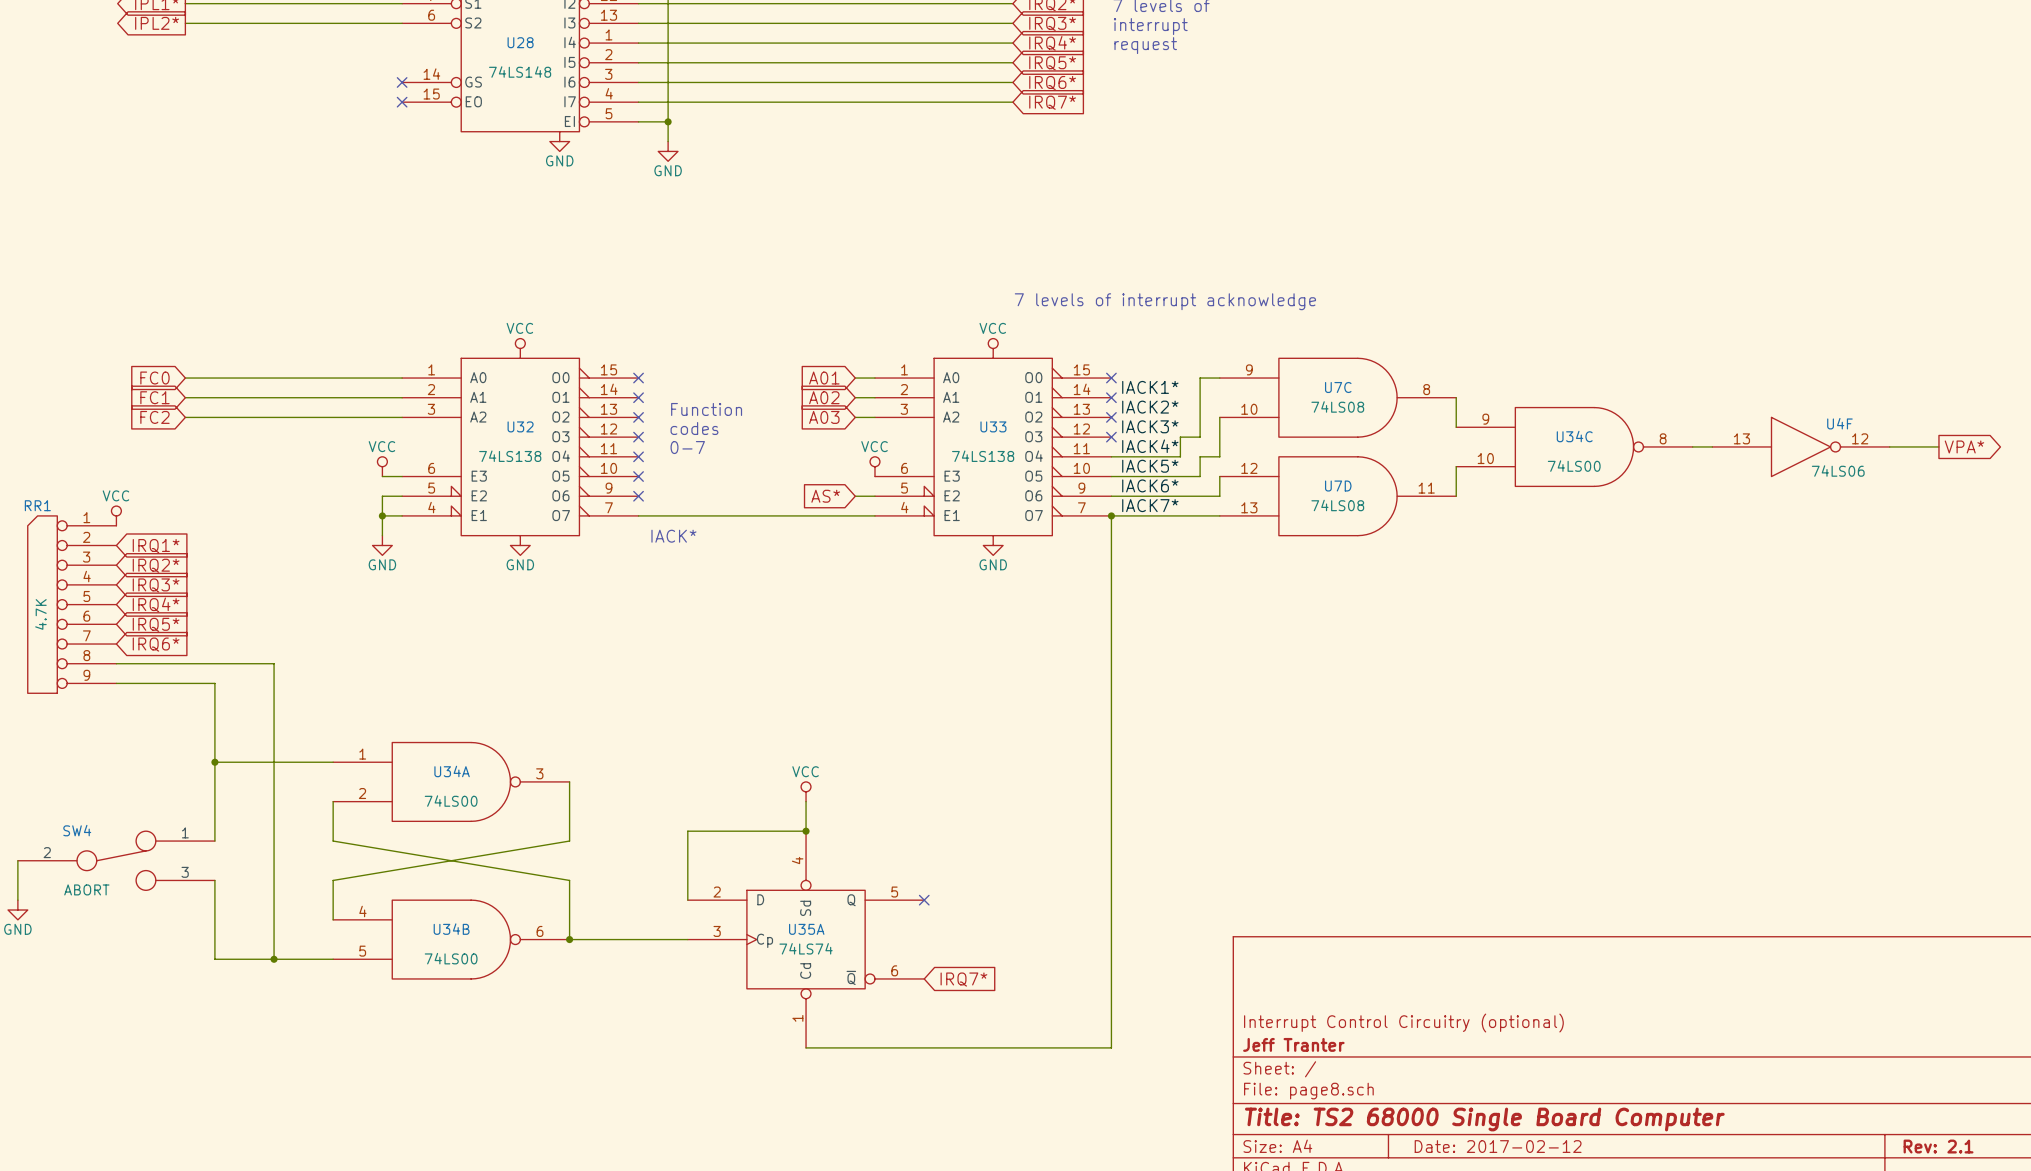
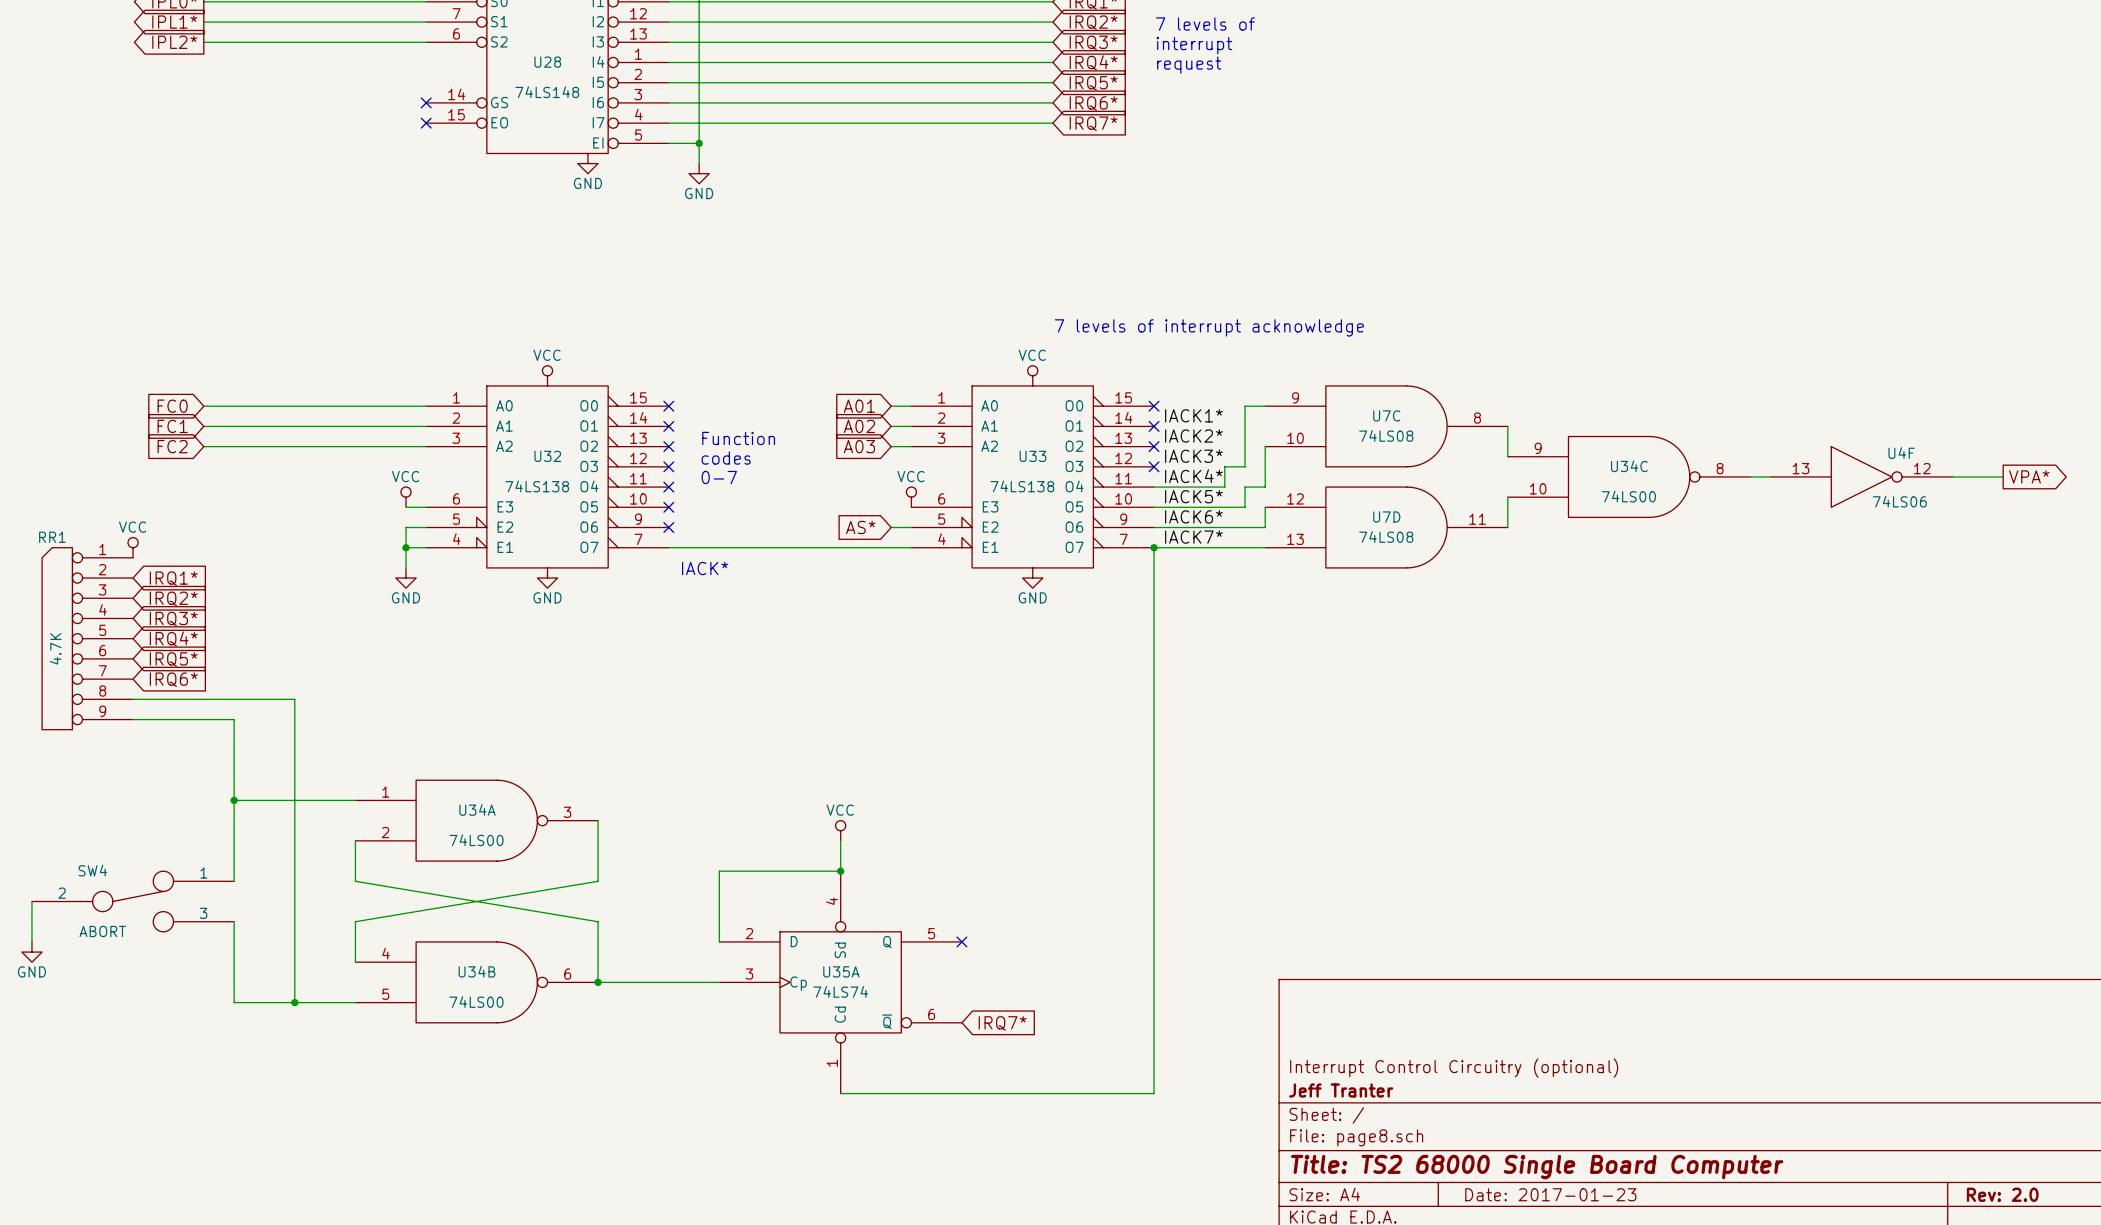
title block: Date: 2017-02-12 (1498, 1146) -> Date: 2017-01-23 (1550, 1194)
title block: Rev: 2.1 (1938, 1146) -> Rev: 2.0 (2002, 1194)

